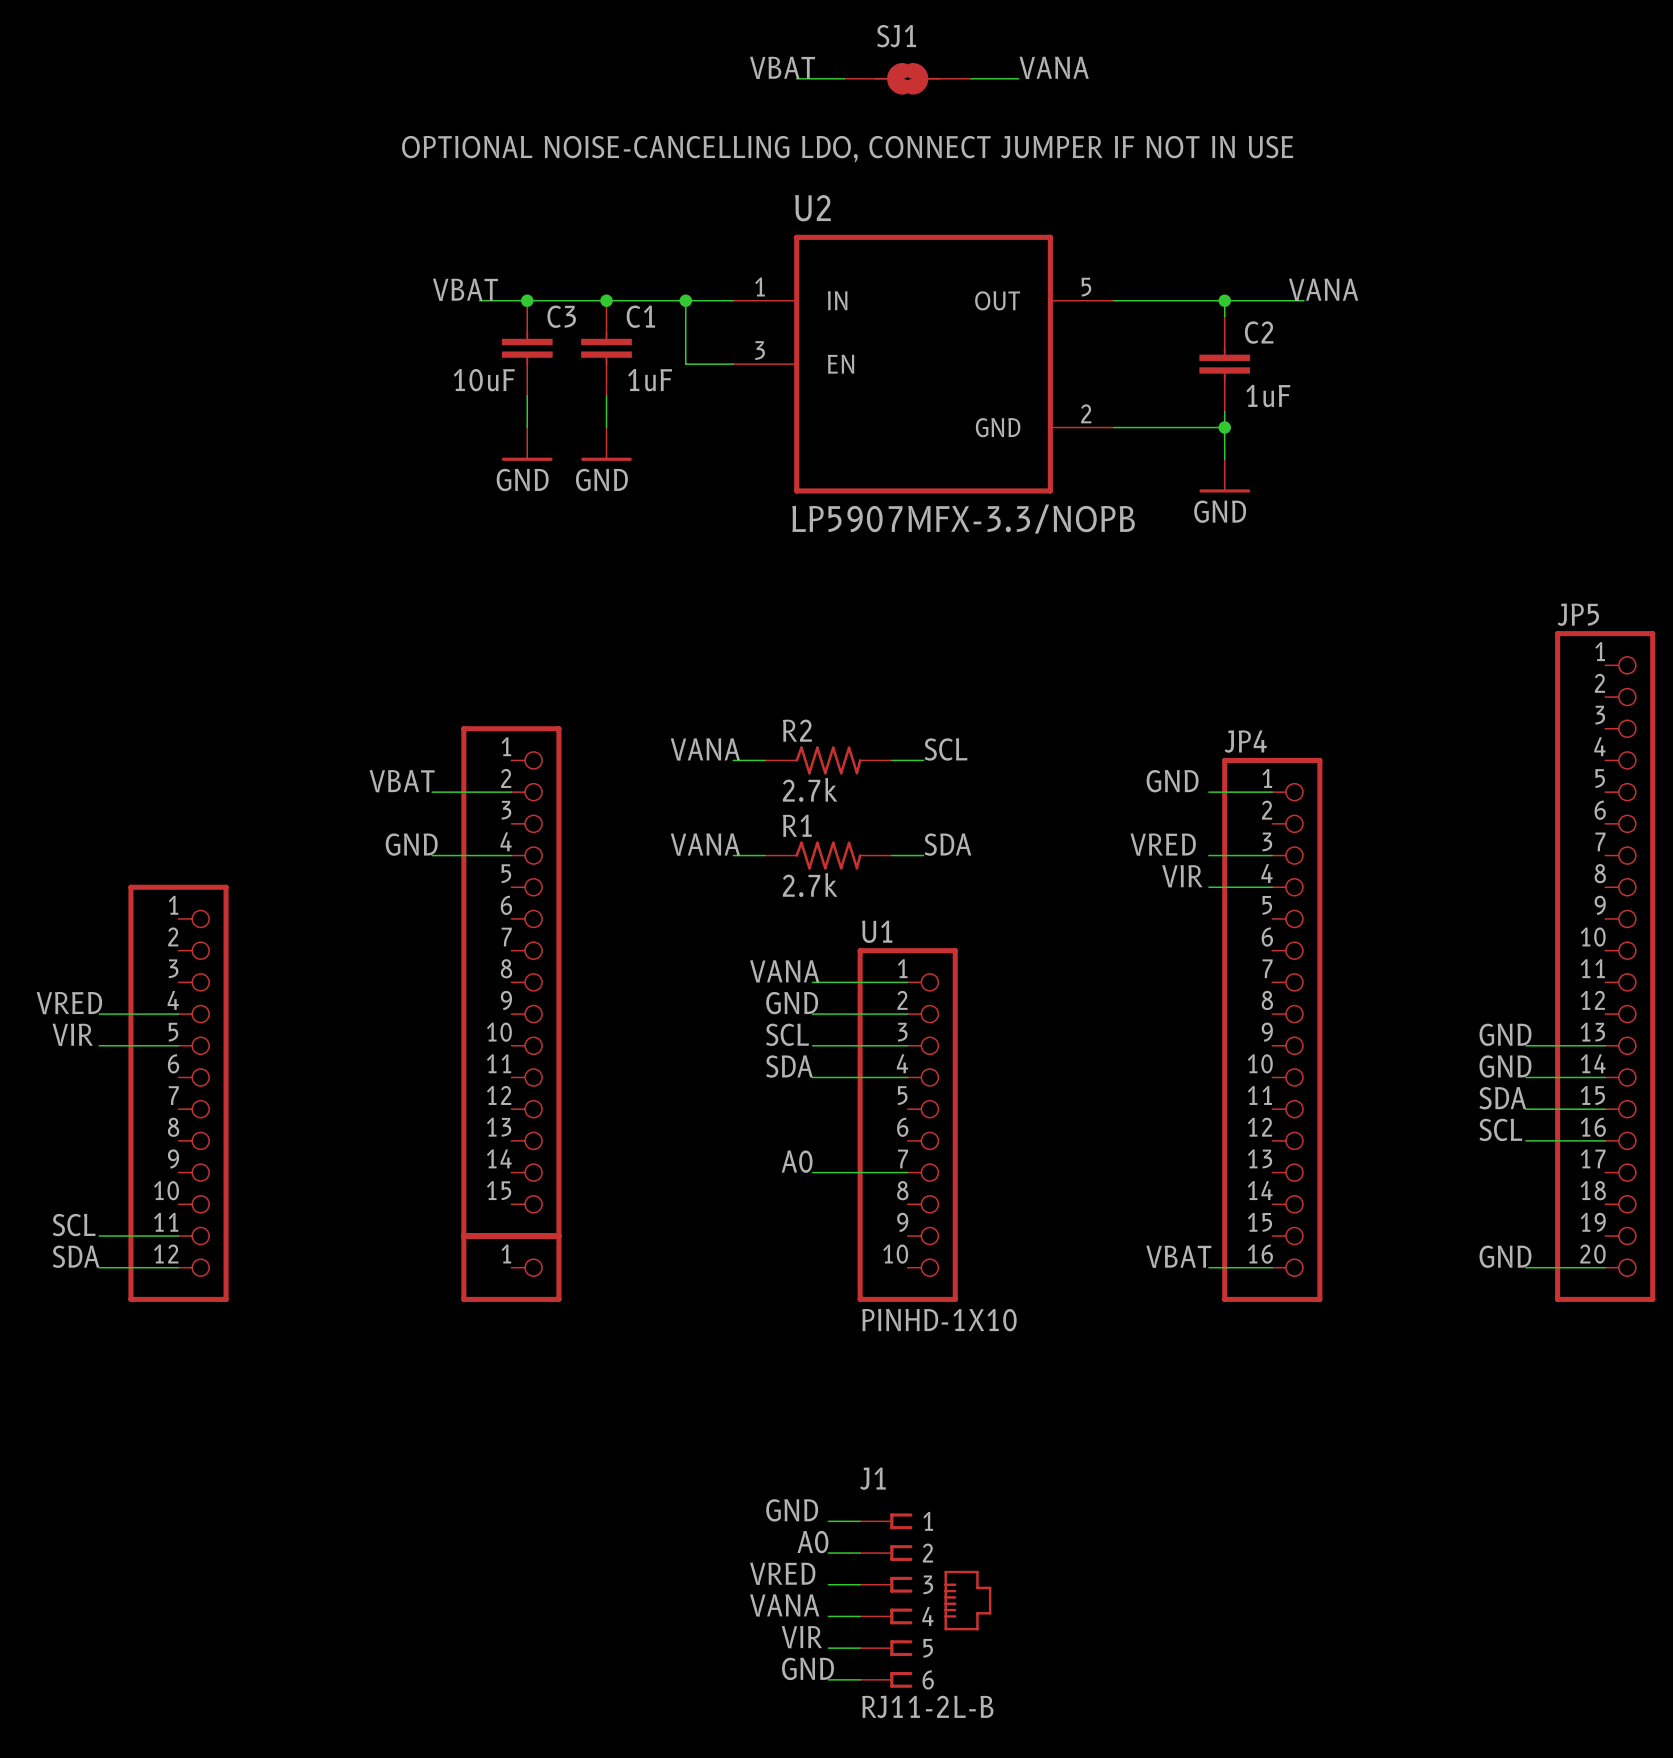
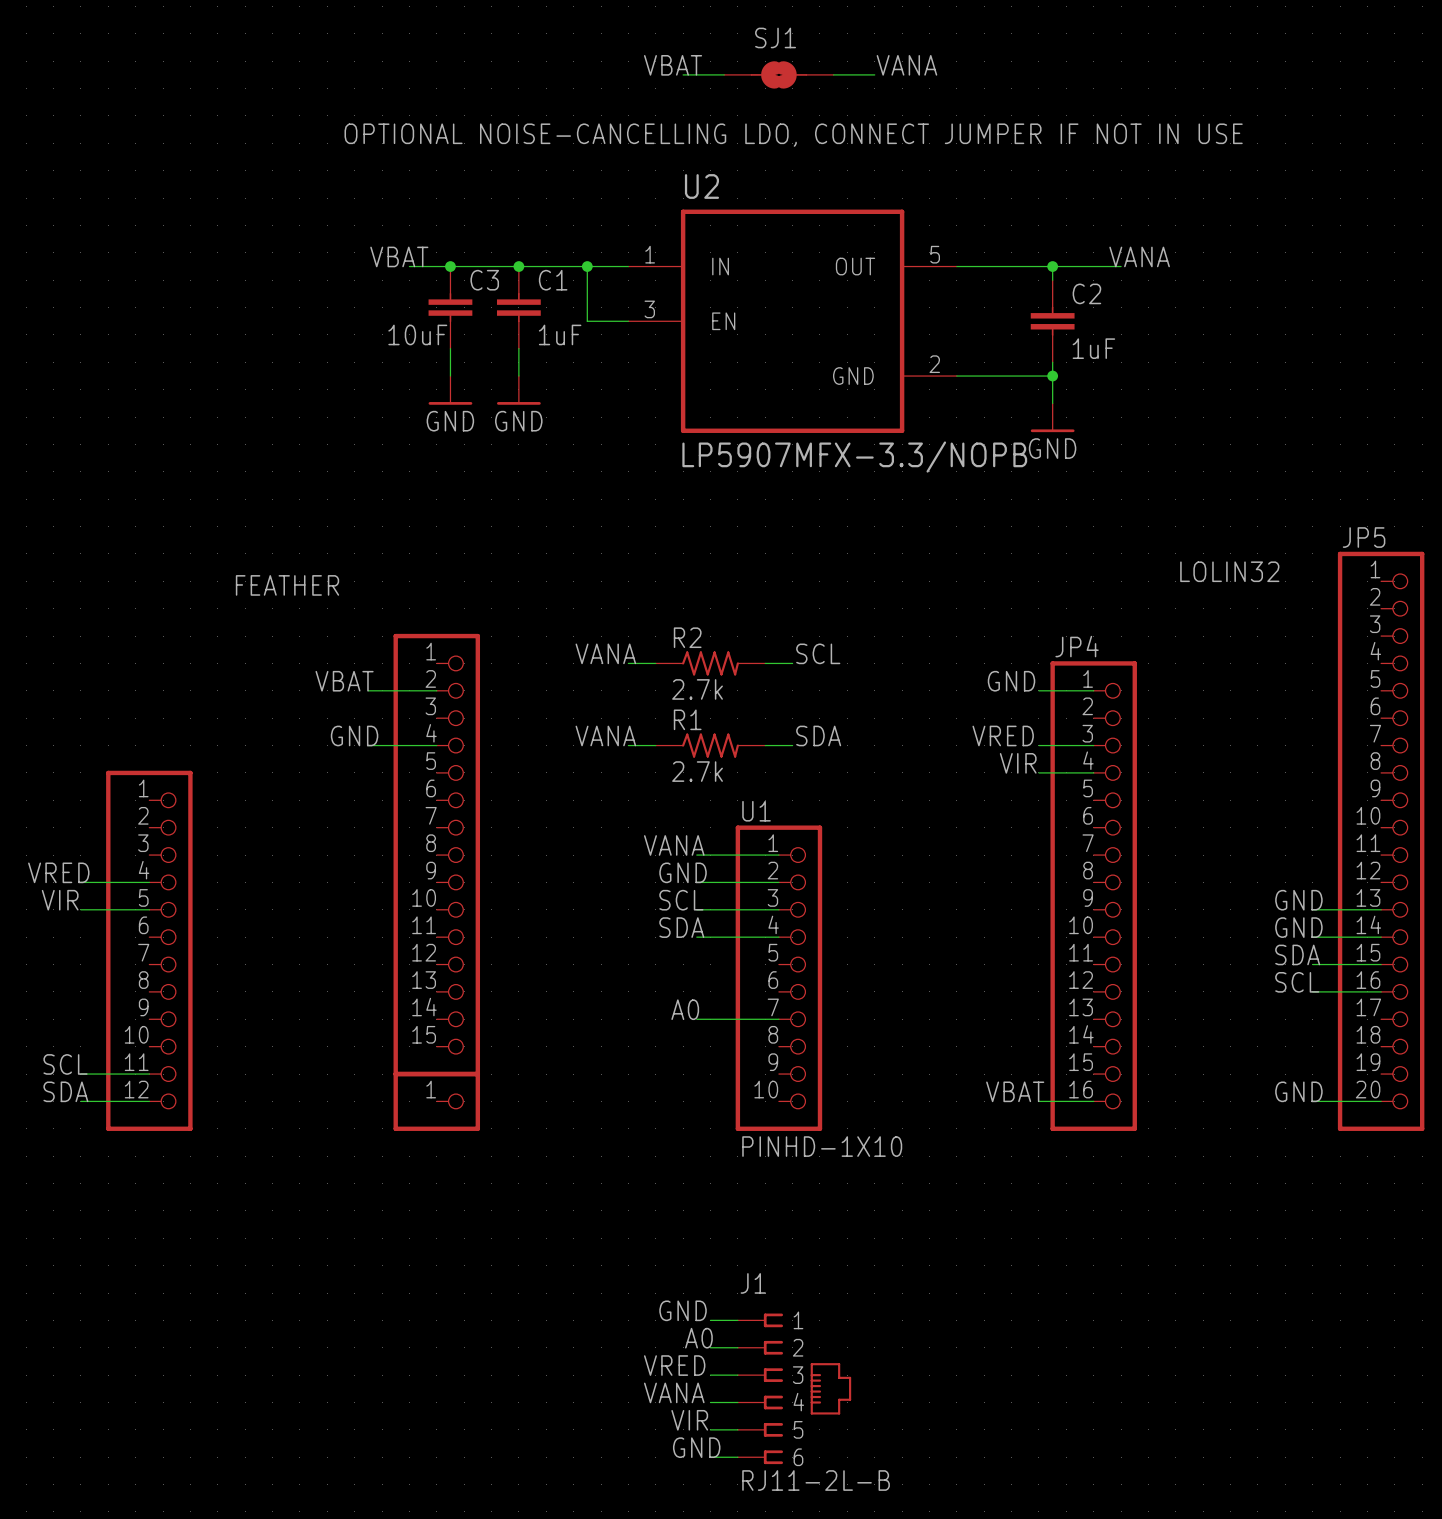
text: none -> LOLIN32 (1229, 571)
text: none -> FEATHER (287, 585)

